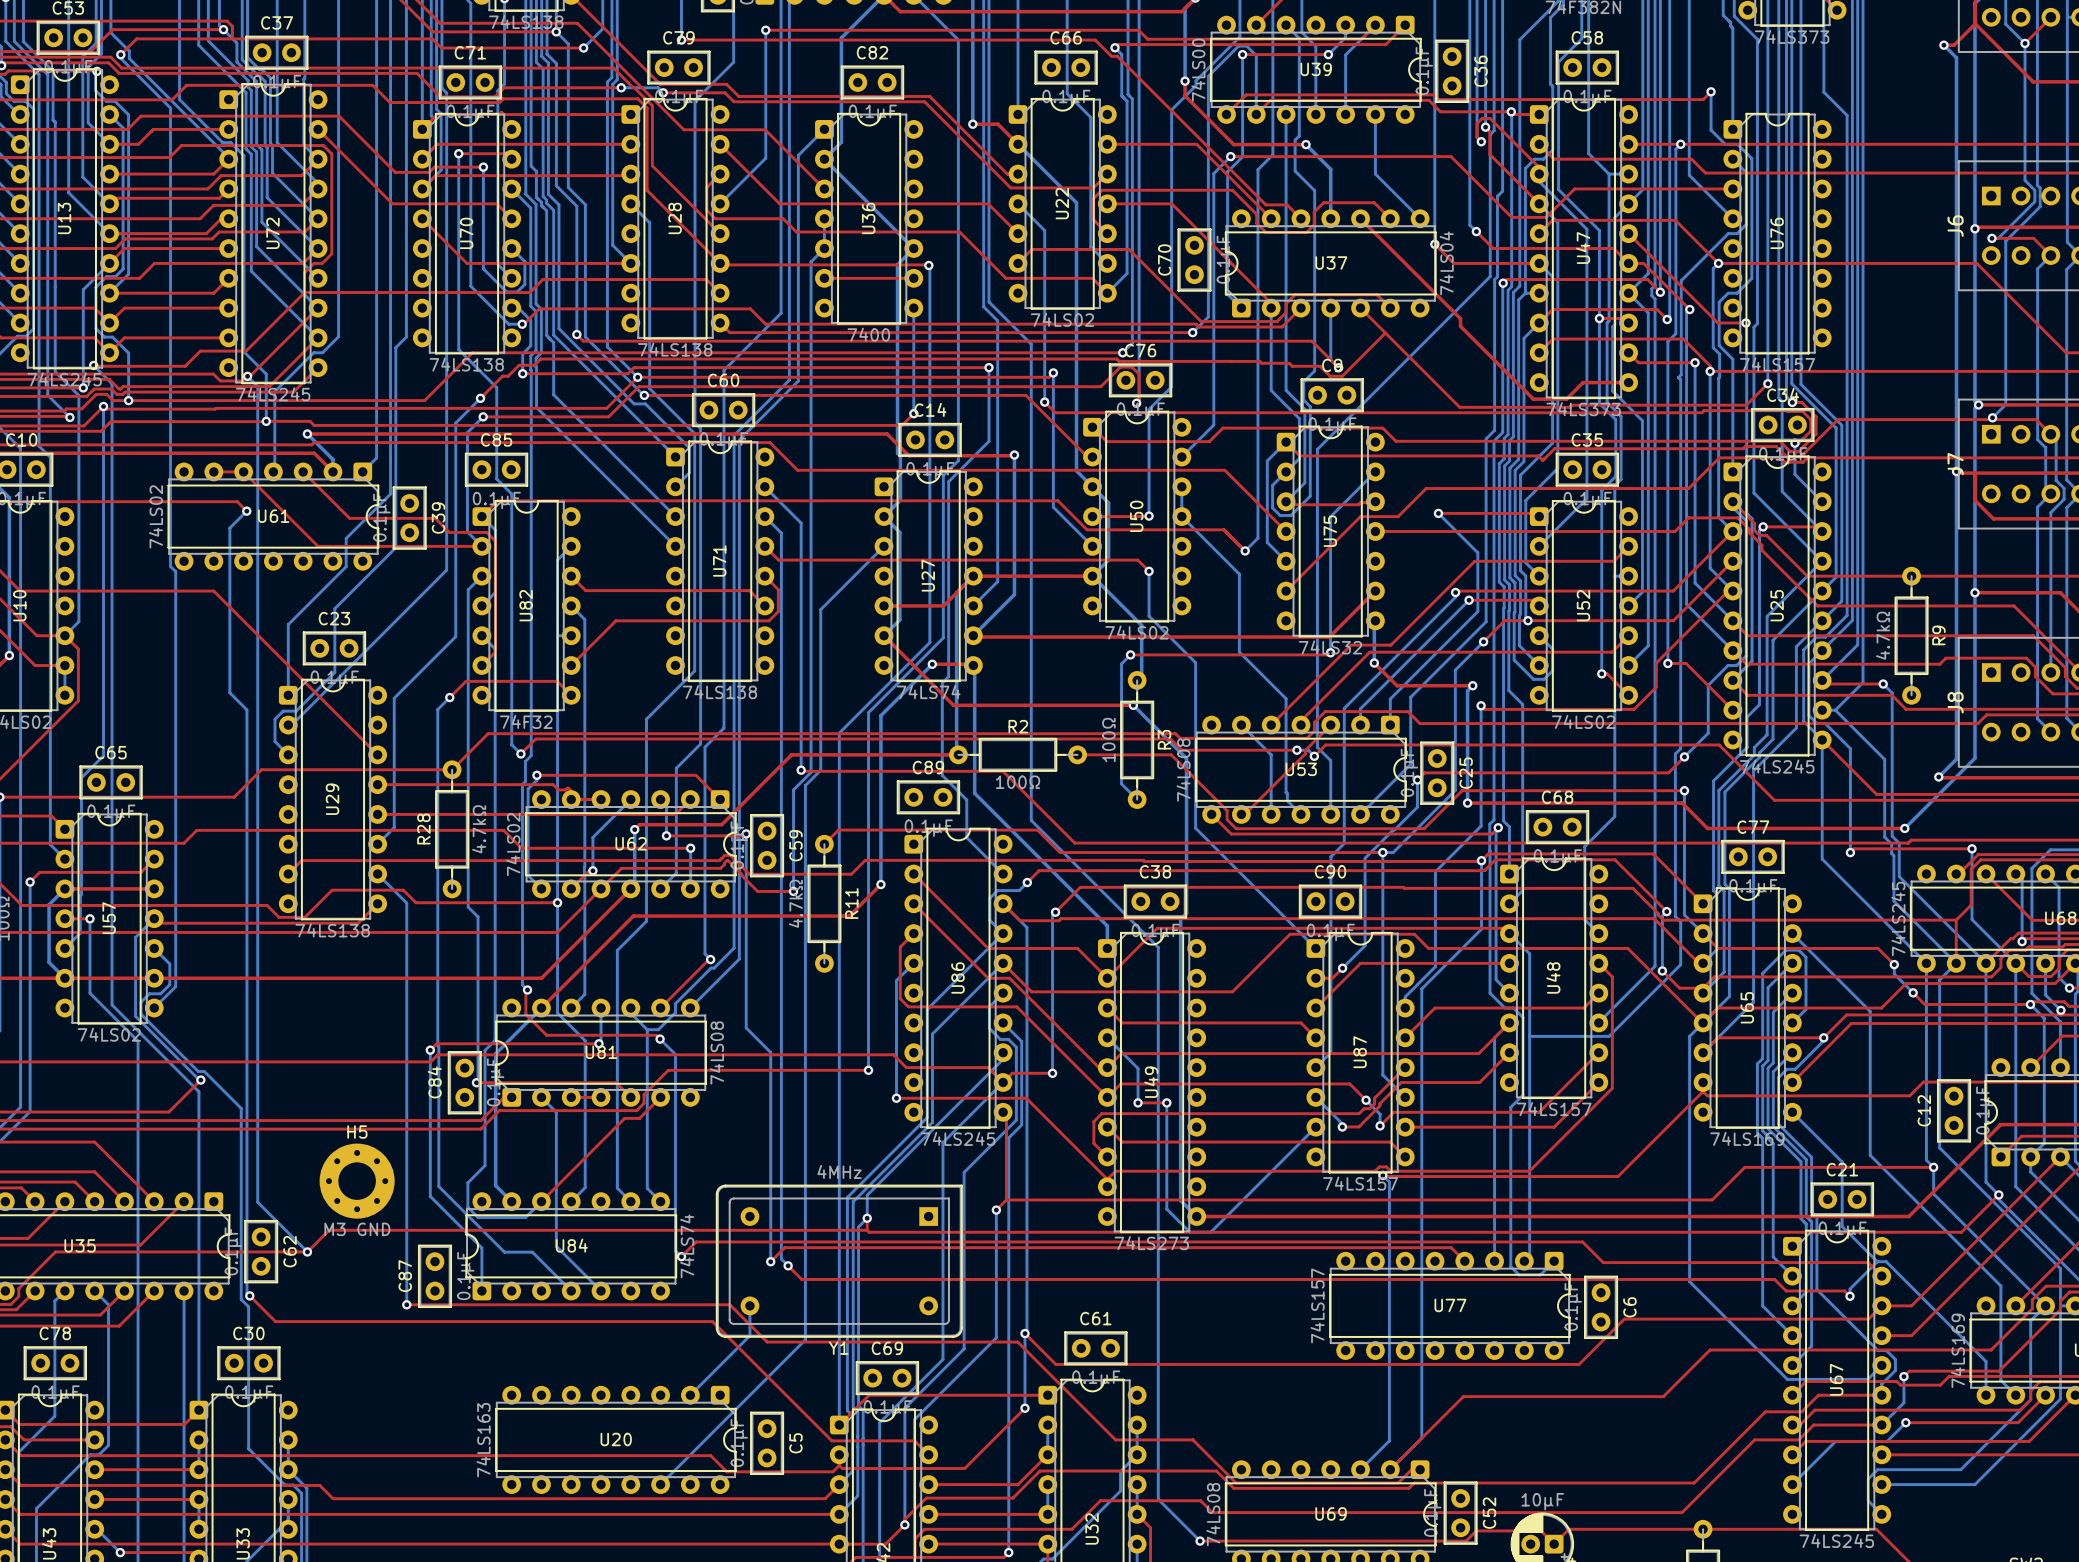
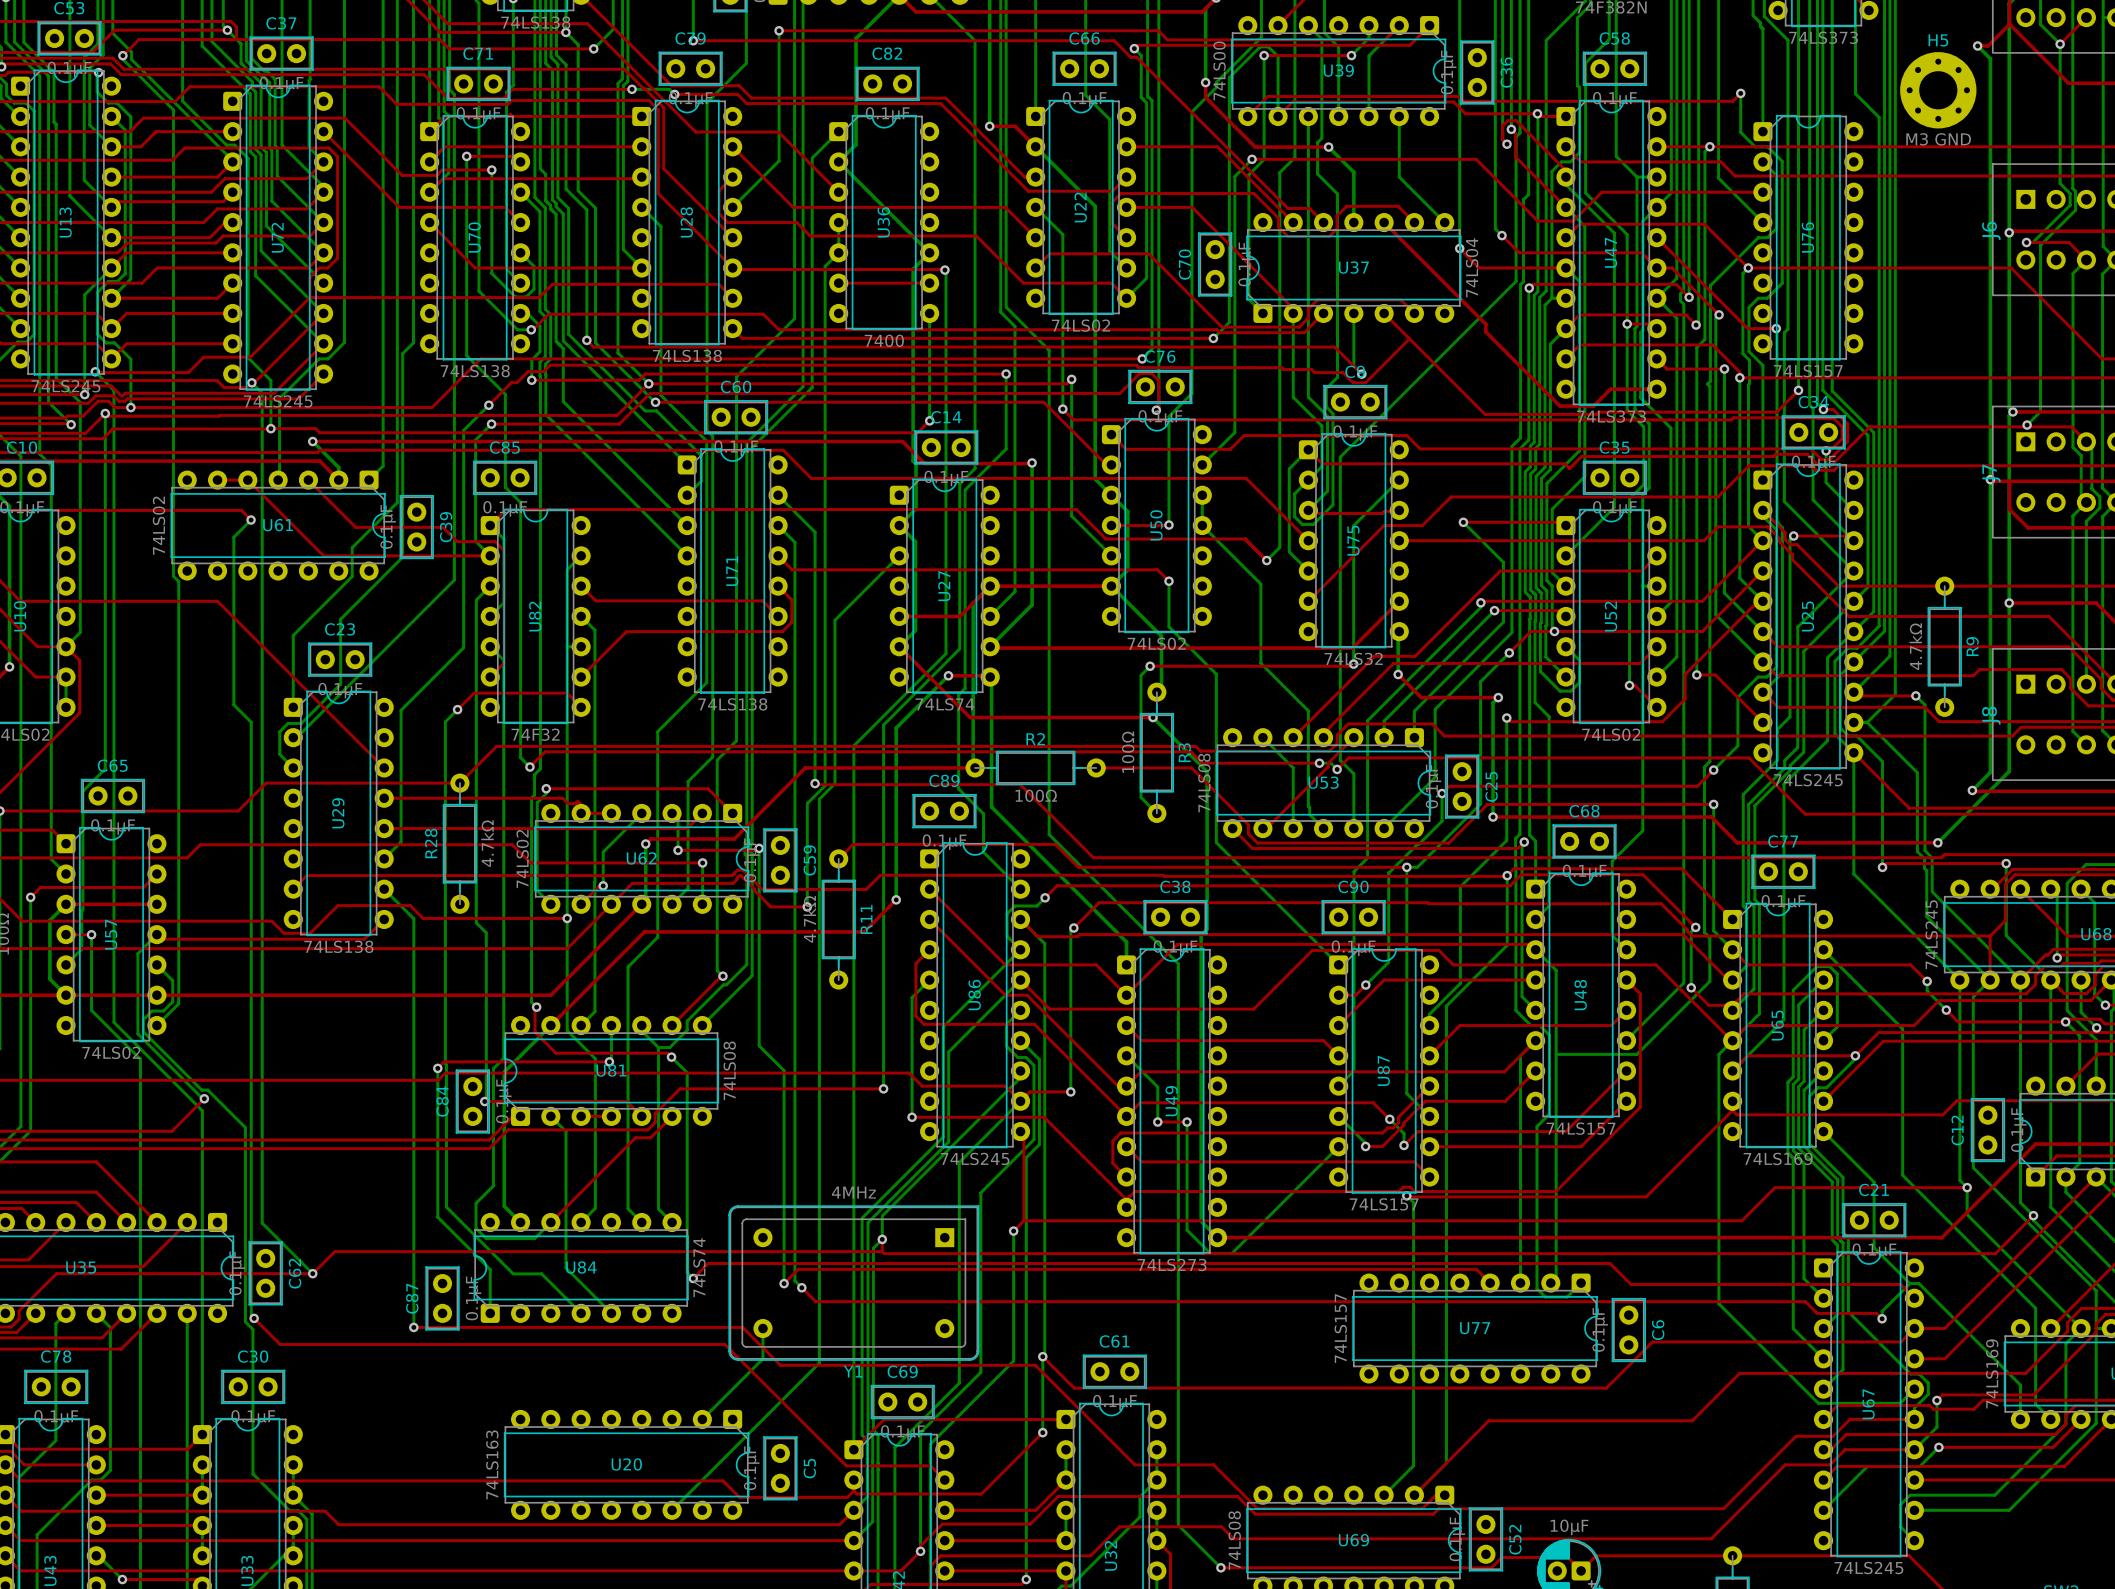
H5 position: (357, 1181) -> (1938, 90)

